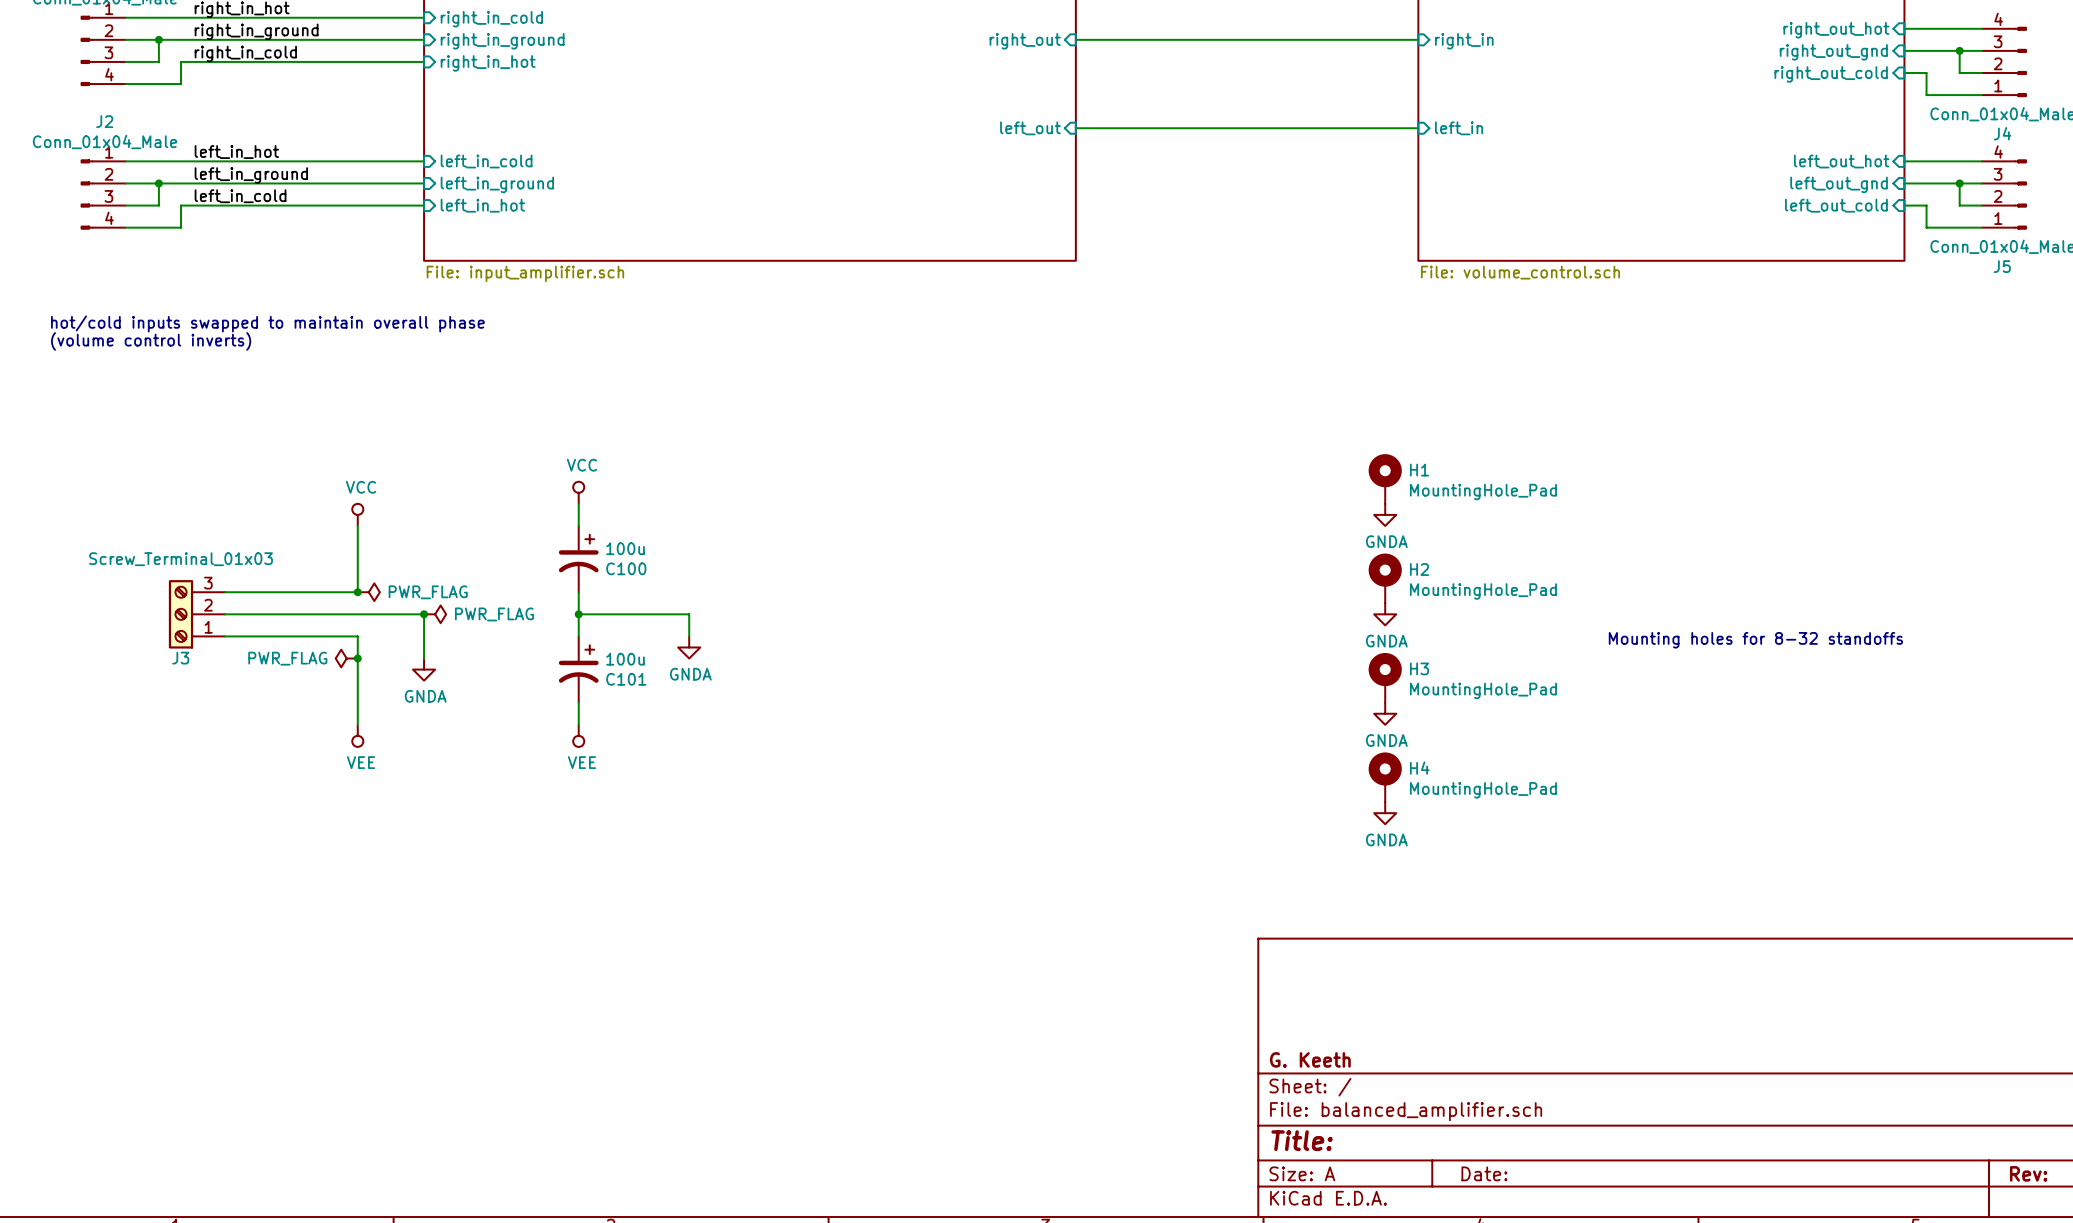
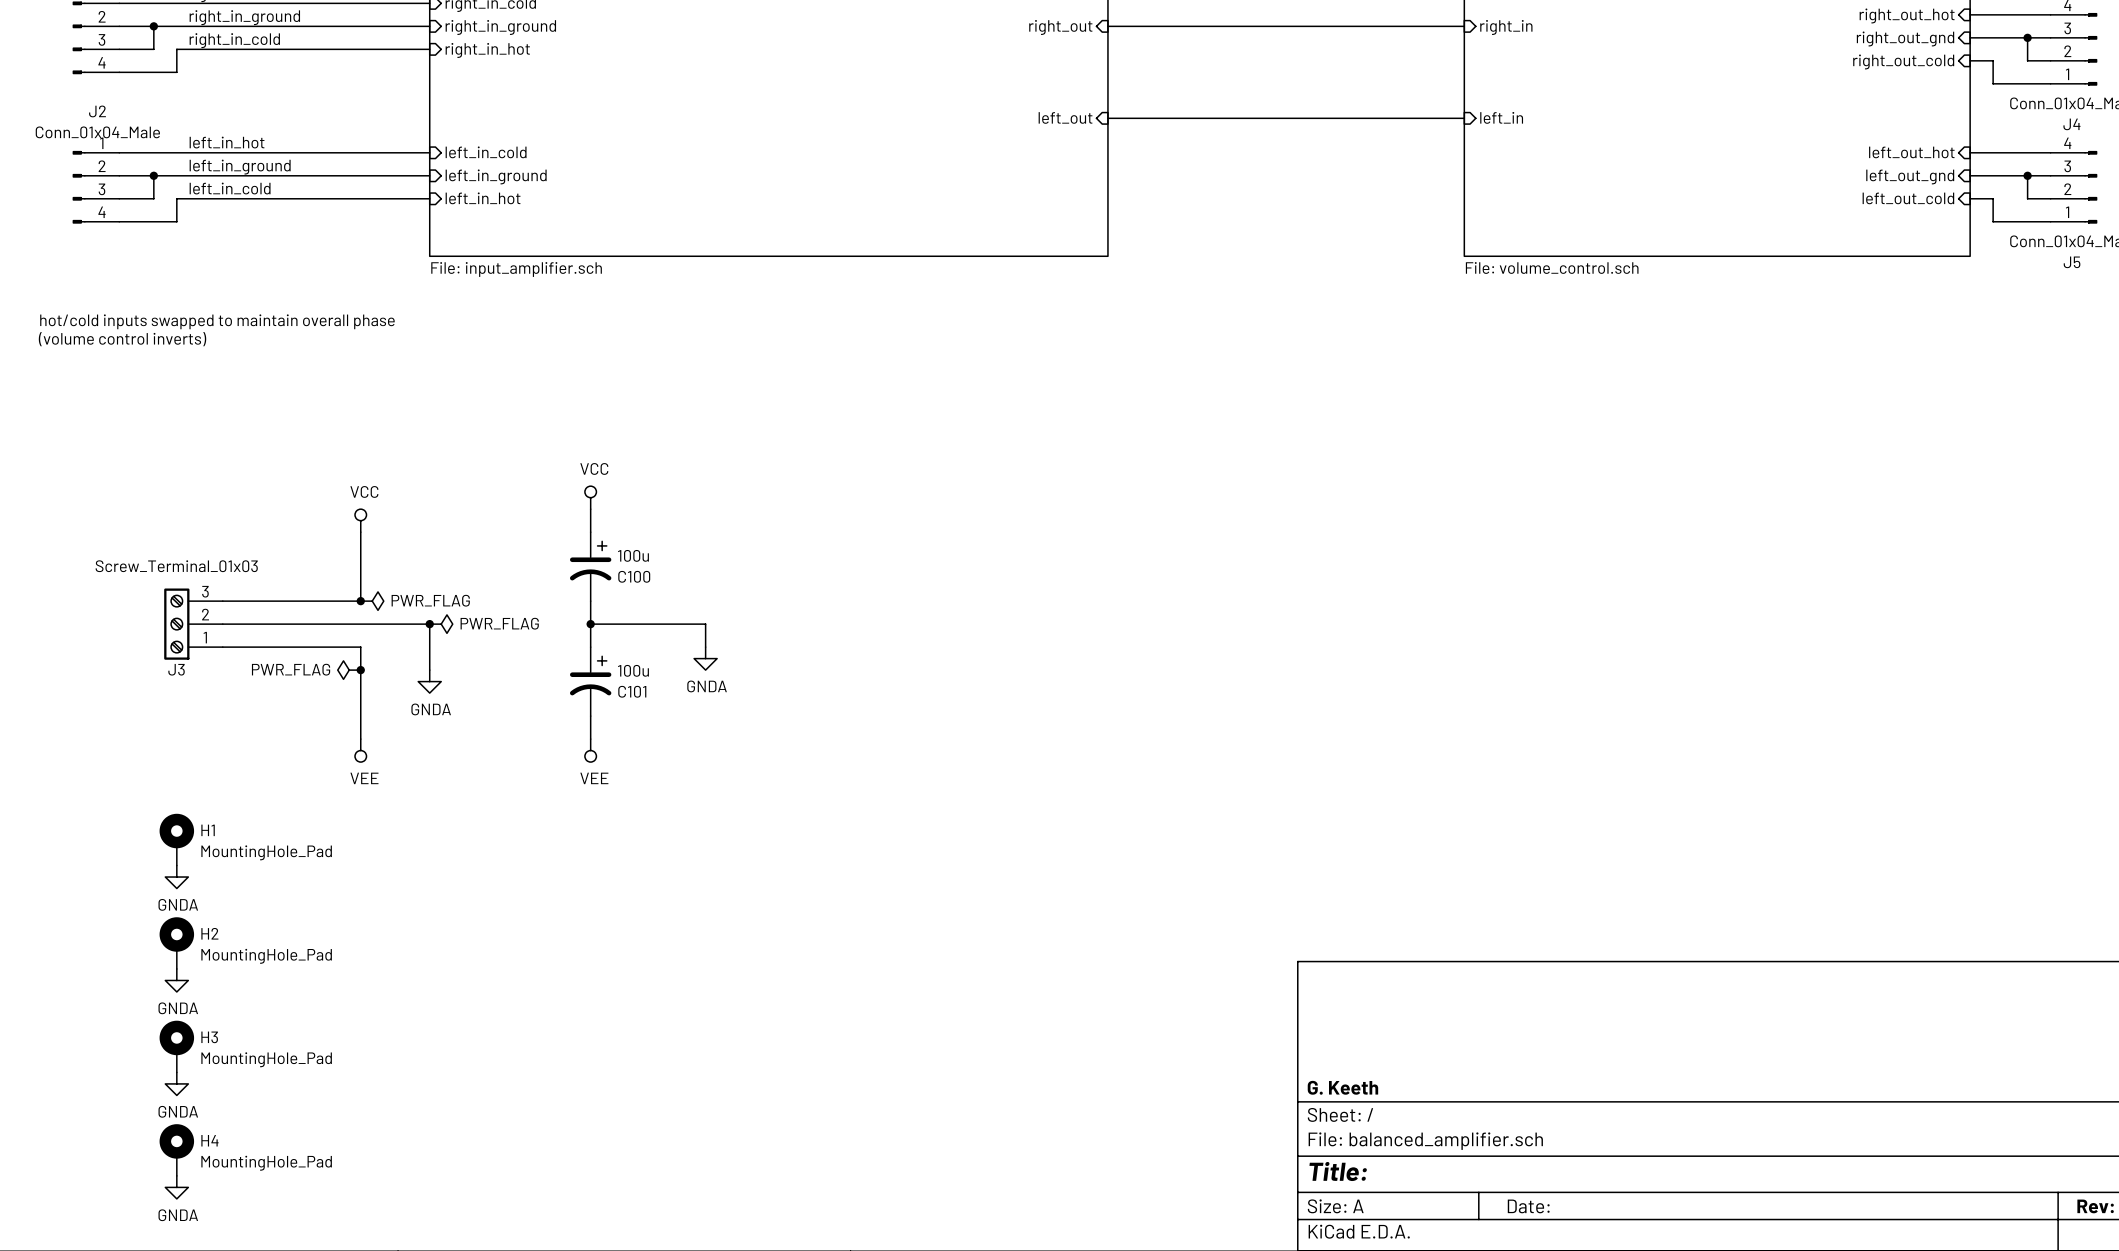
H1 position: (1385, 478) -> (176, 839)
power symbol: GNDA (1385, 514) -> none
H2 position: (1385, 578) -> (176, 943)
power symbol: GNDA (1385, 614) -> none
text: Mounting holes for 8-32 standoffs (1755, 640) -> none
H3 position: (1385, 677) -> (176, 1046)
power symbol: GNDA (1385, 713) -> none
H4 position: (1385, 777) -> (176, 1150)
power symbol: GNDA (1385, 813) -> none
power symbol: none -> GNDA (176, 877)
power symbol: none -> GNDA (176, 980)
power symbol: none -> GNDA (176, 1083)
power symbol: none -> GNDA (176, 1187)

